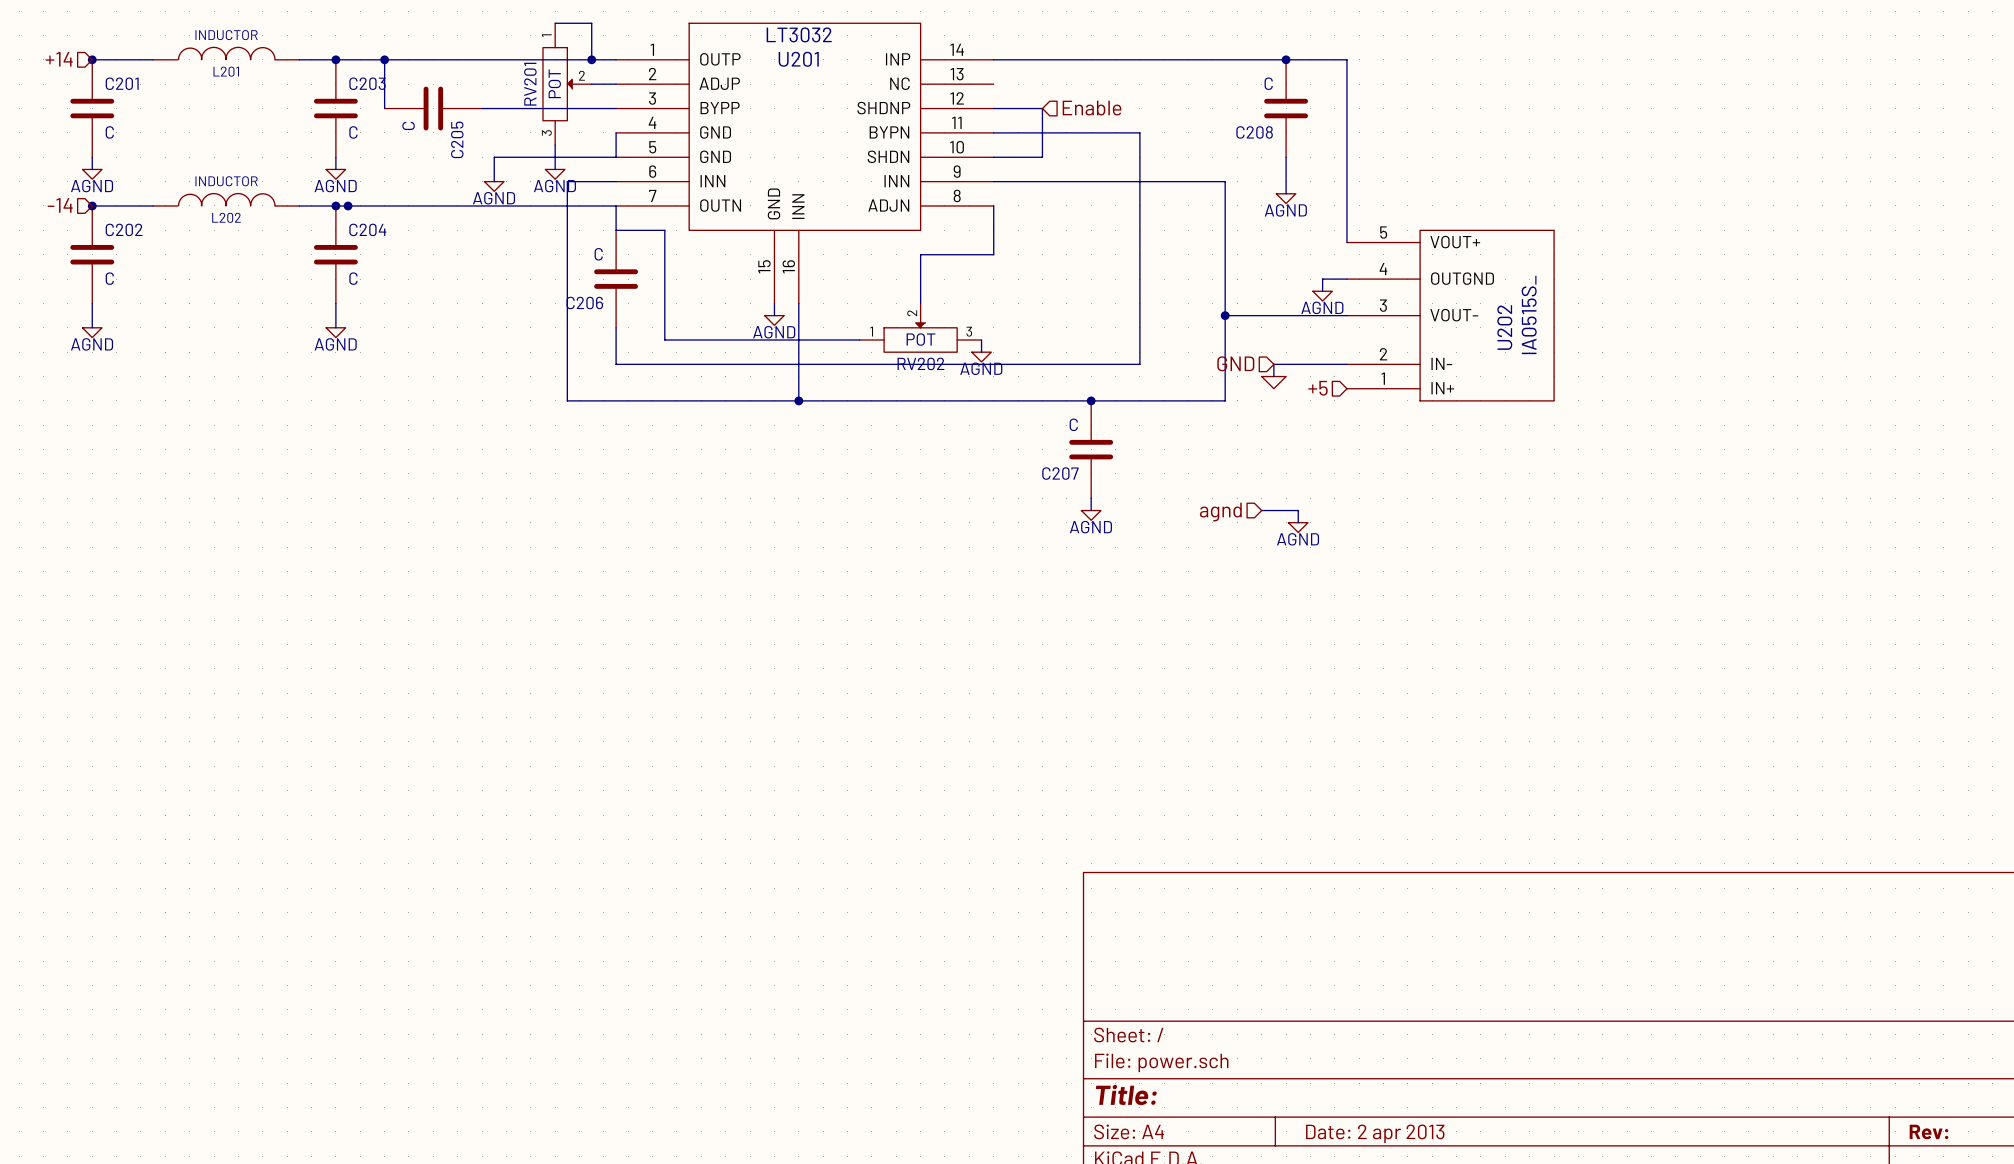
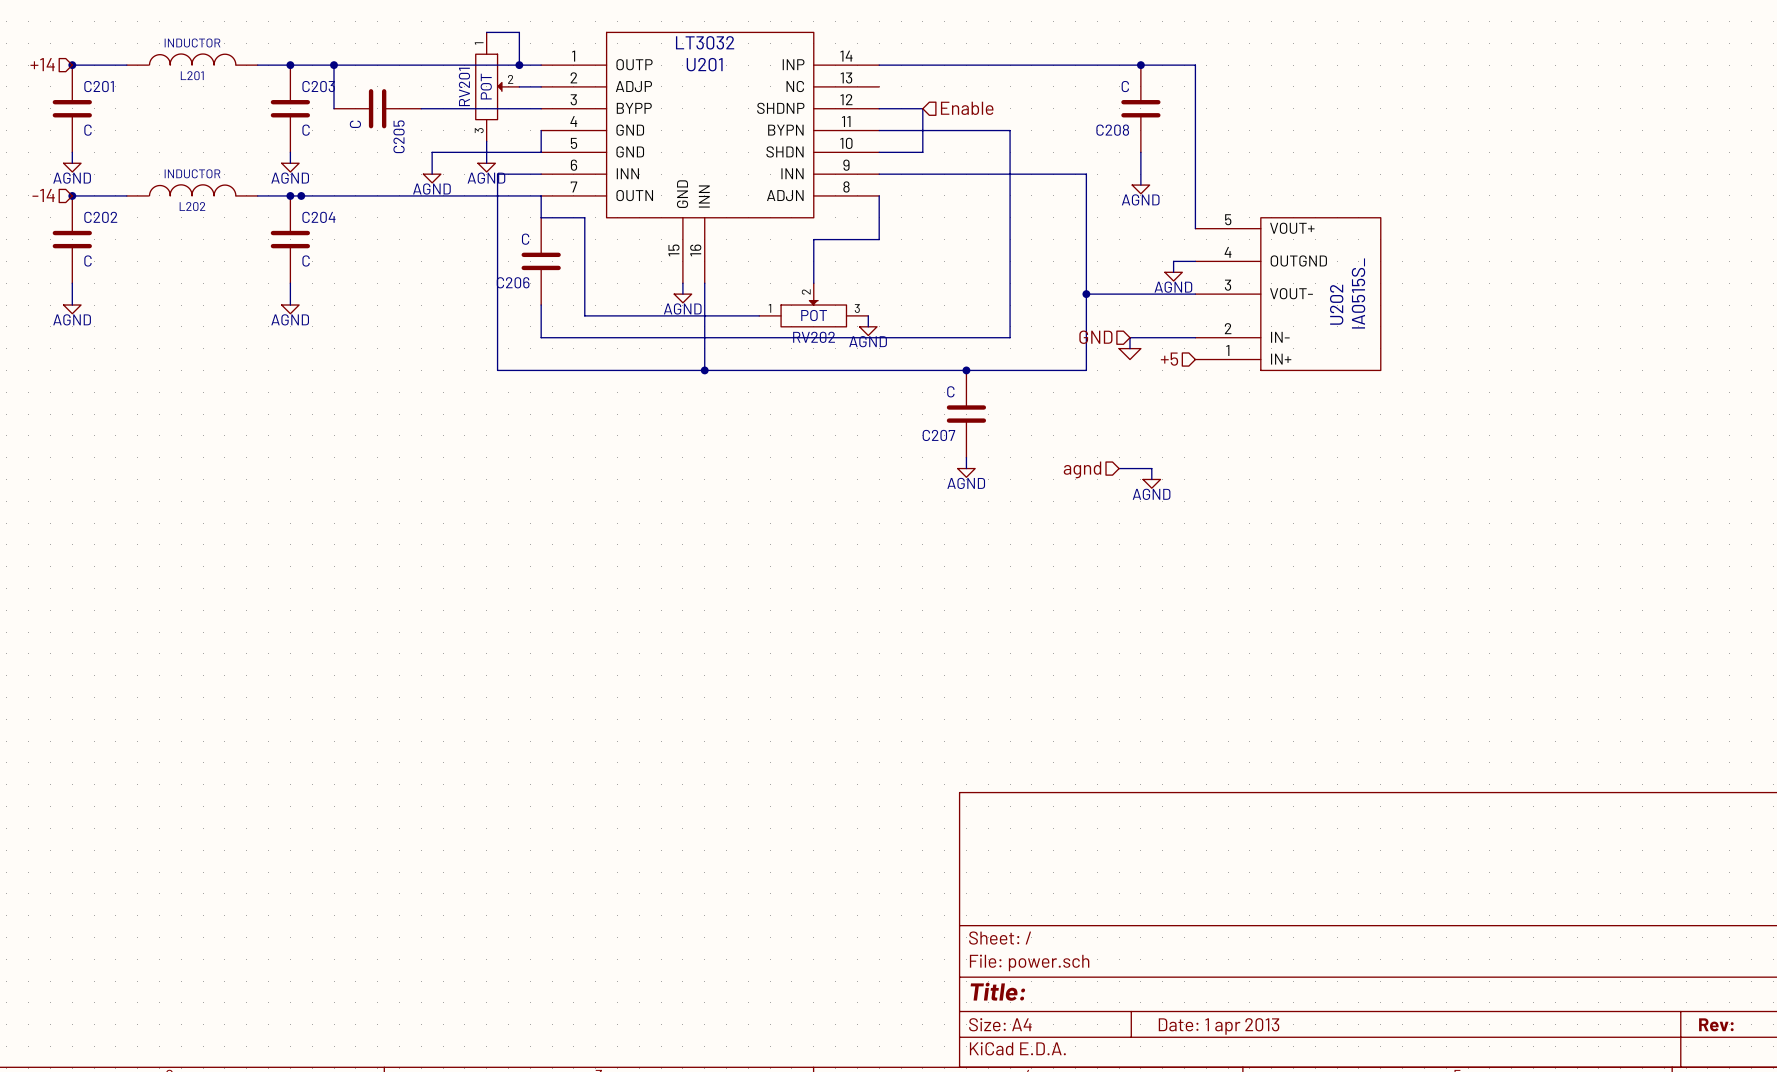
title block: Date: 2 apr 2013 (1375, 1133) -> Date: 1 apr 2013 (1219, 1026)

